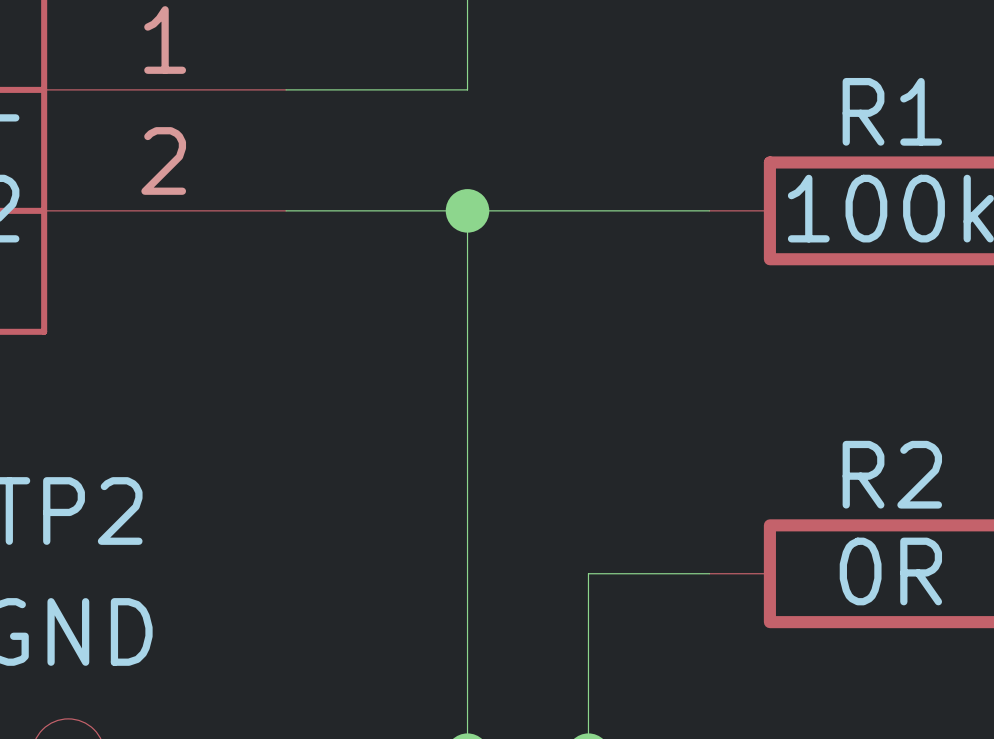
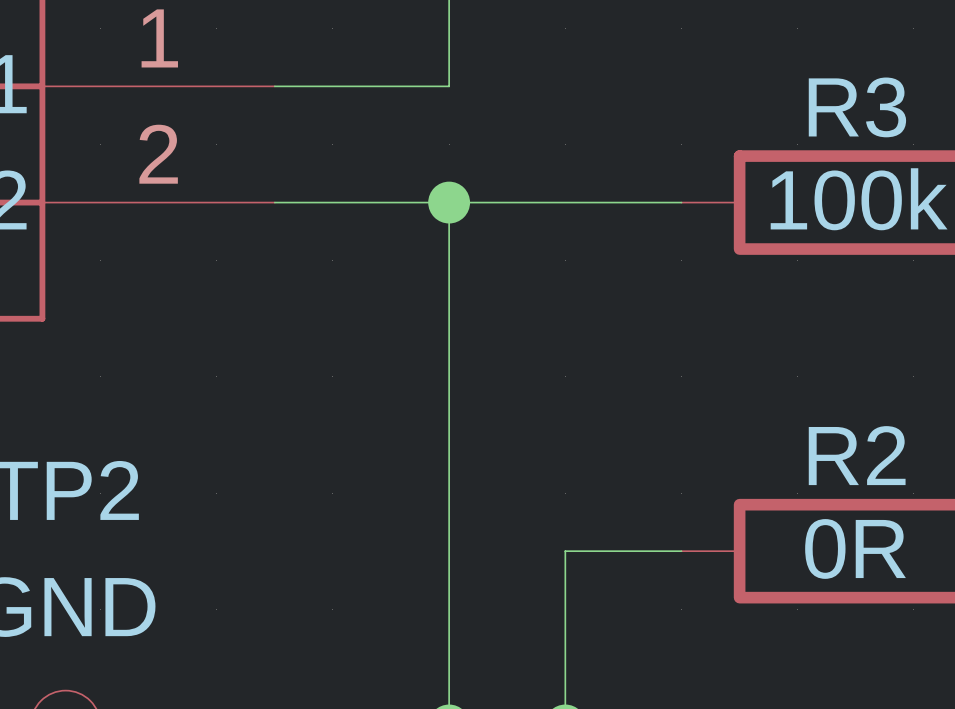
R1 name: R1 (892, 111) -> R3 (857, 107)

